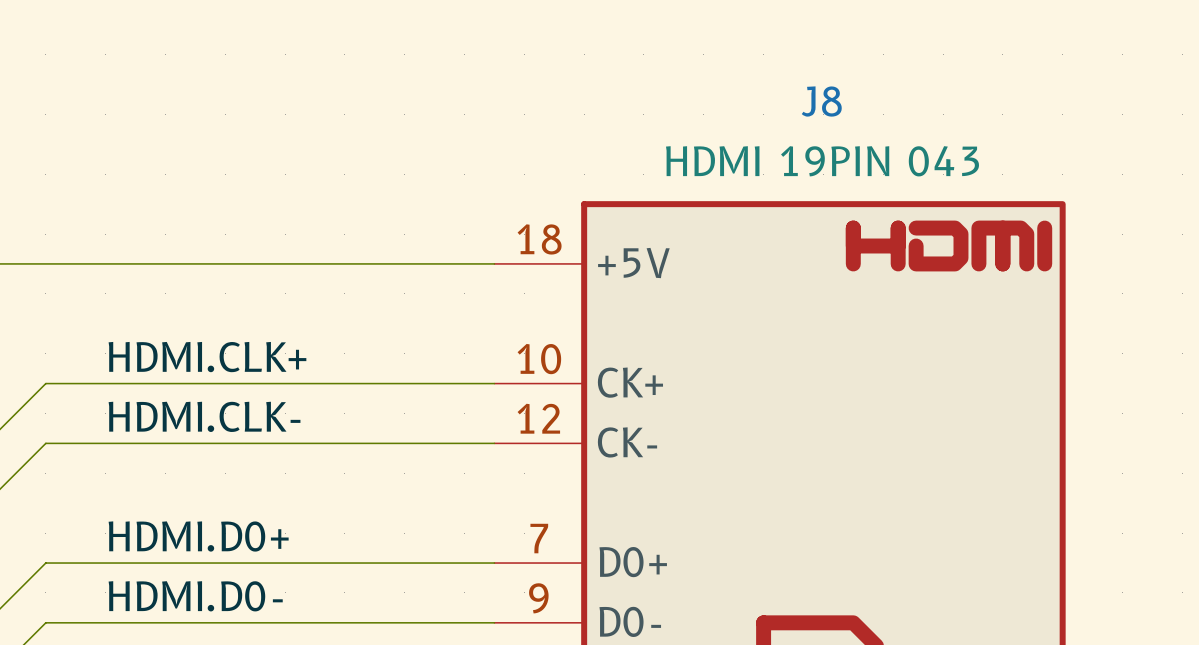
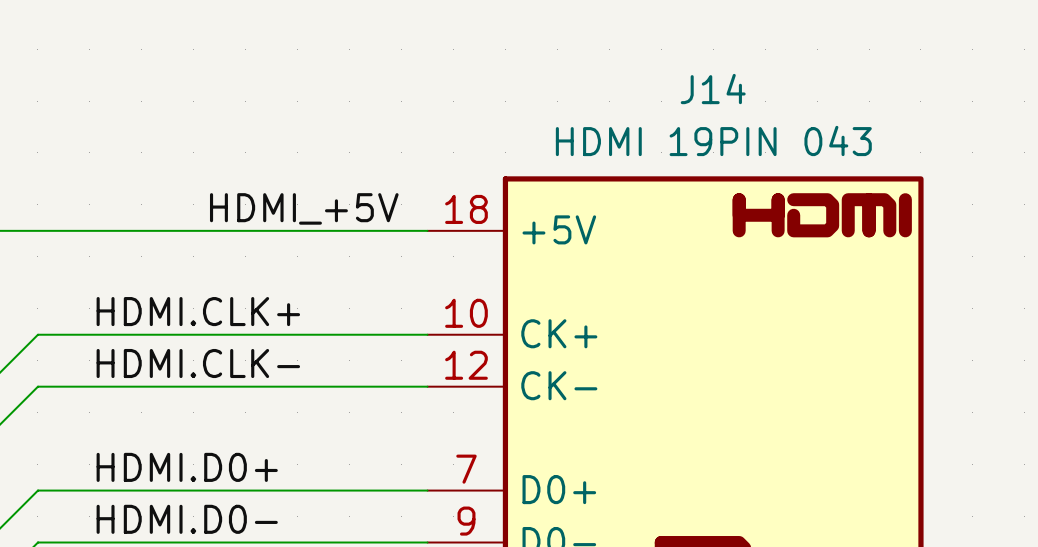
J8 name: J8 (821, 101) -> J14 (713, 89)
label: none -> HDMI_+5V (304, 208)

